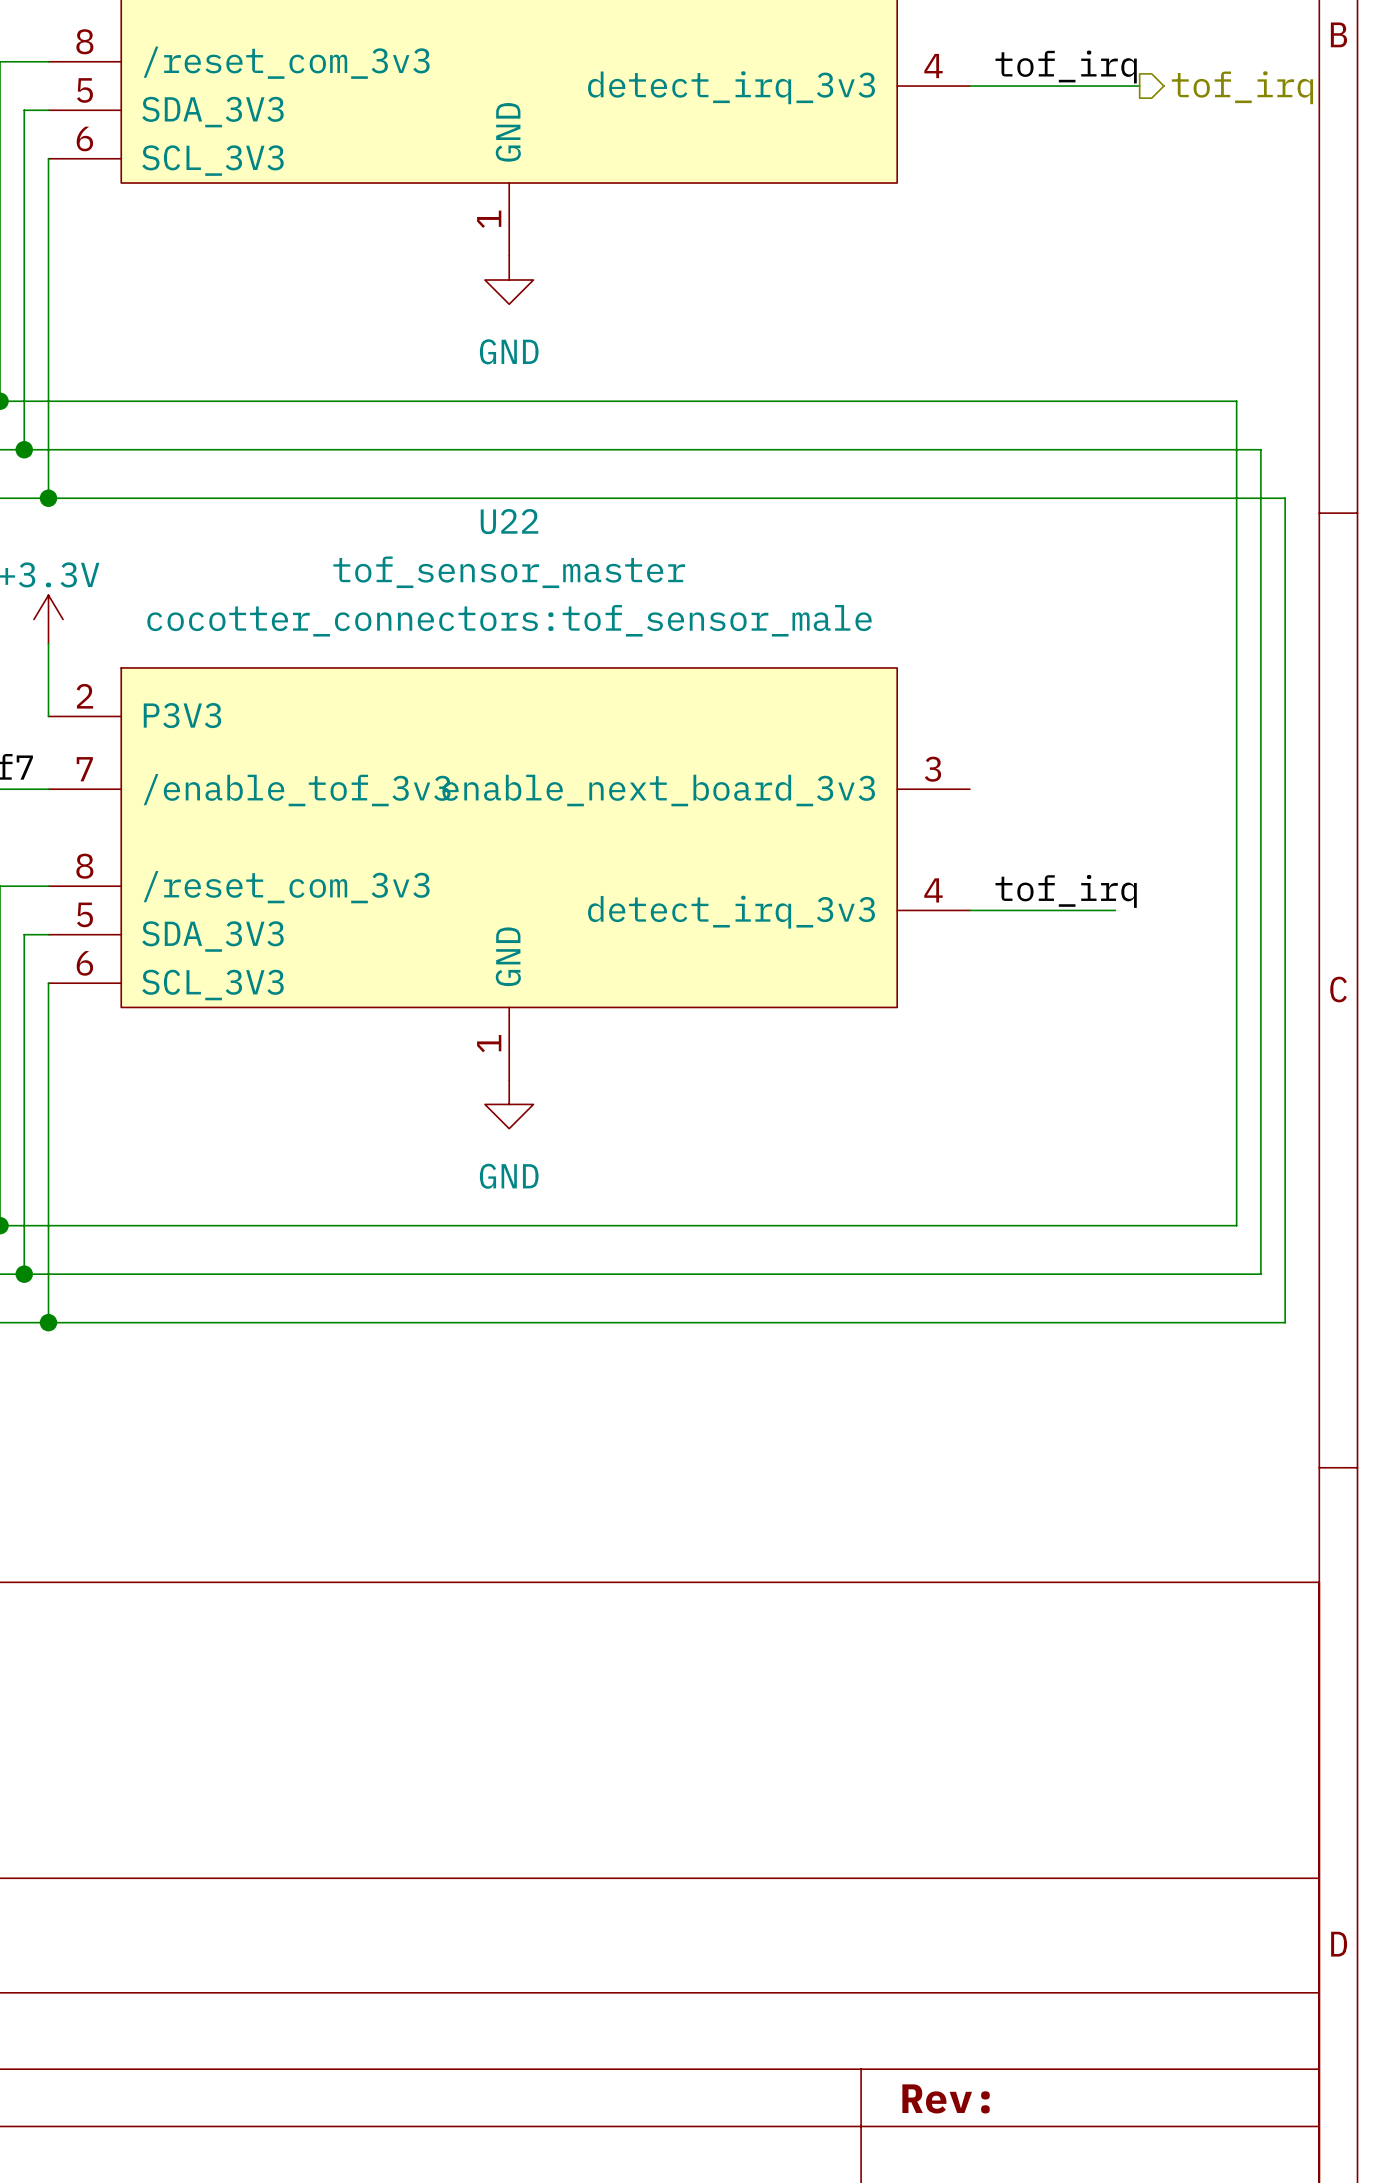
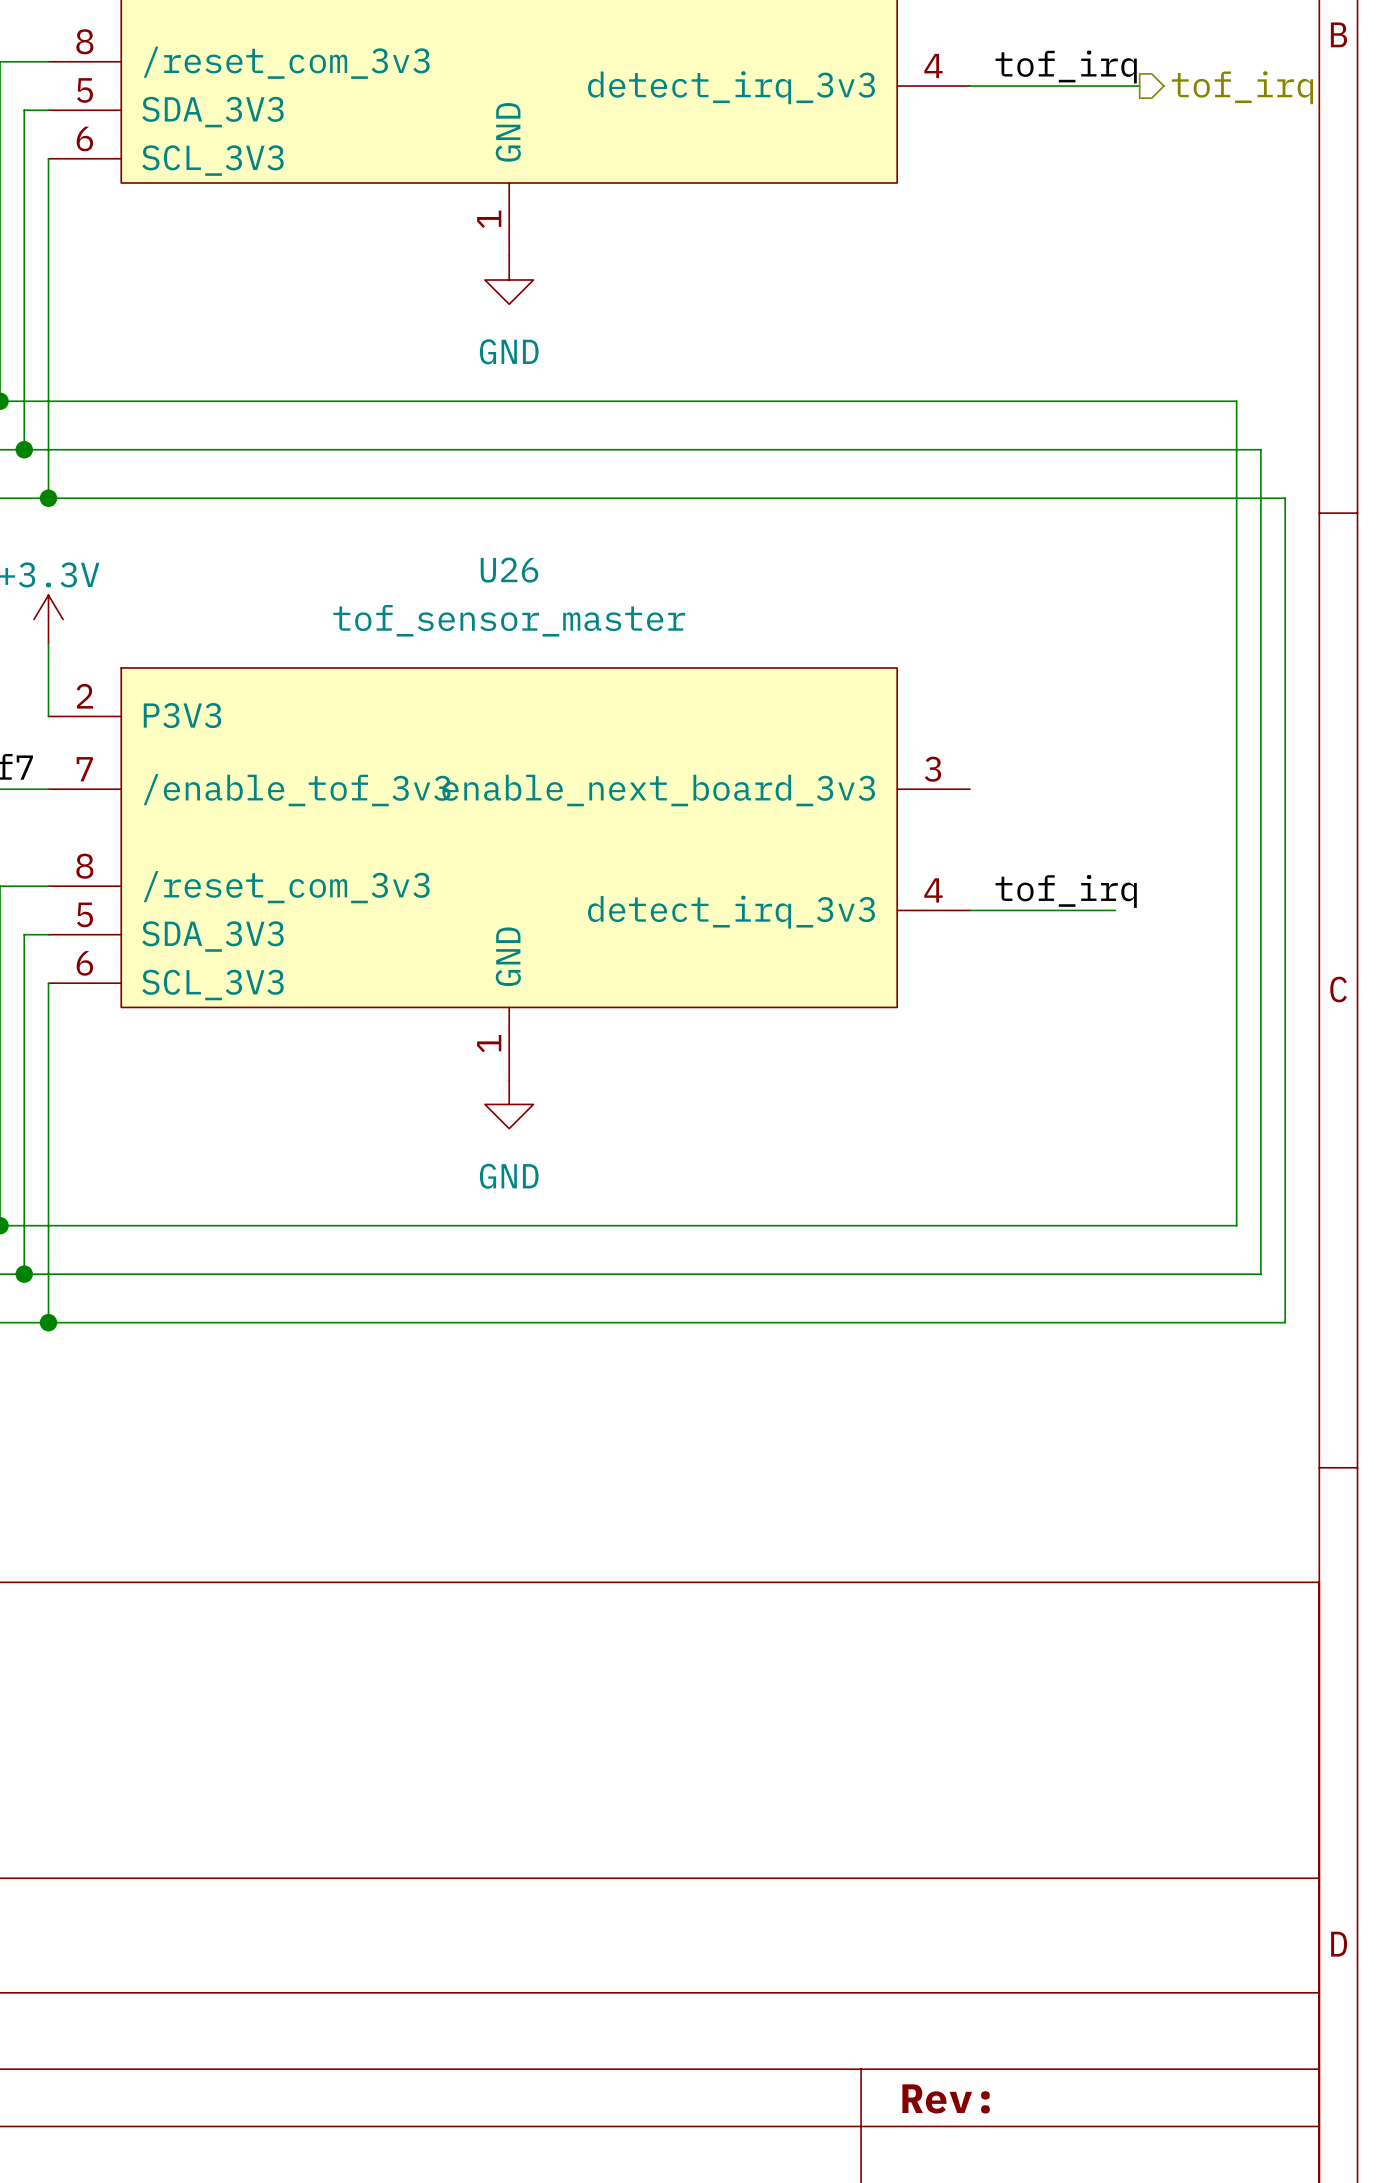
U22 name: U22 (509, 521) -> U26 (509, 570)
U22 value position: tof_sensor_master (509, 572) -> tof_sensor_master (509, 620)
U22 text: cocotter_connectors:tof_sensor_male (509, 620) -> none

